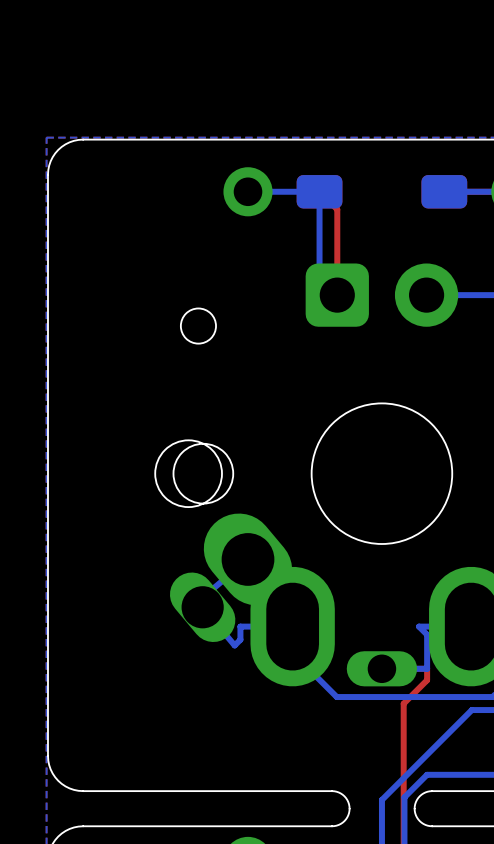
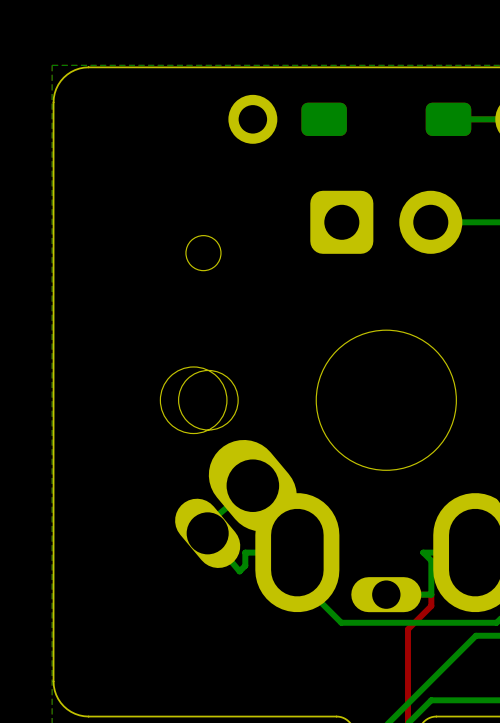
bottom track: (248, 191) (319, 191) (319, 277) (337, 295) -> none
top track: (319, 191) (337, 209) (337, 295) -> none

